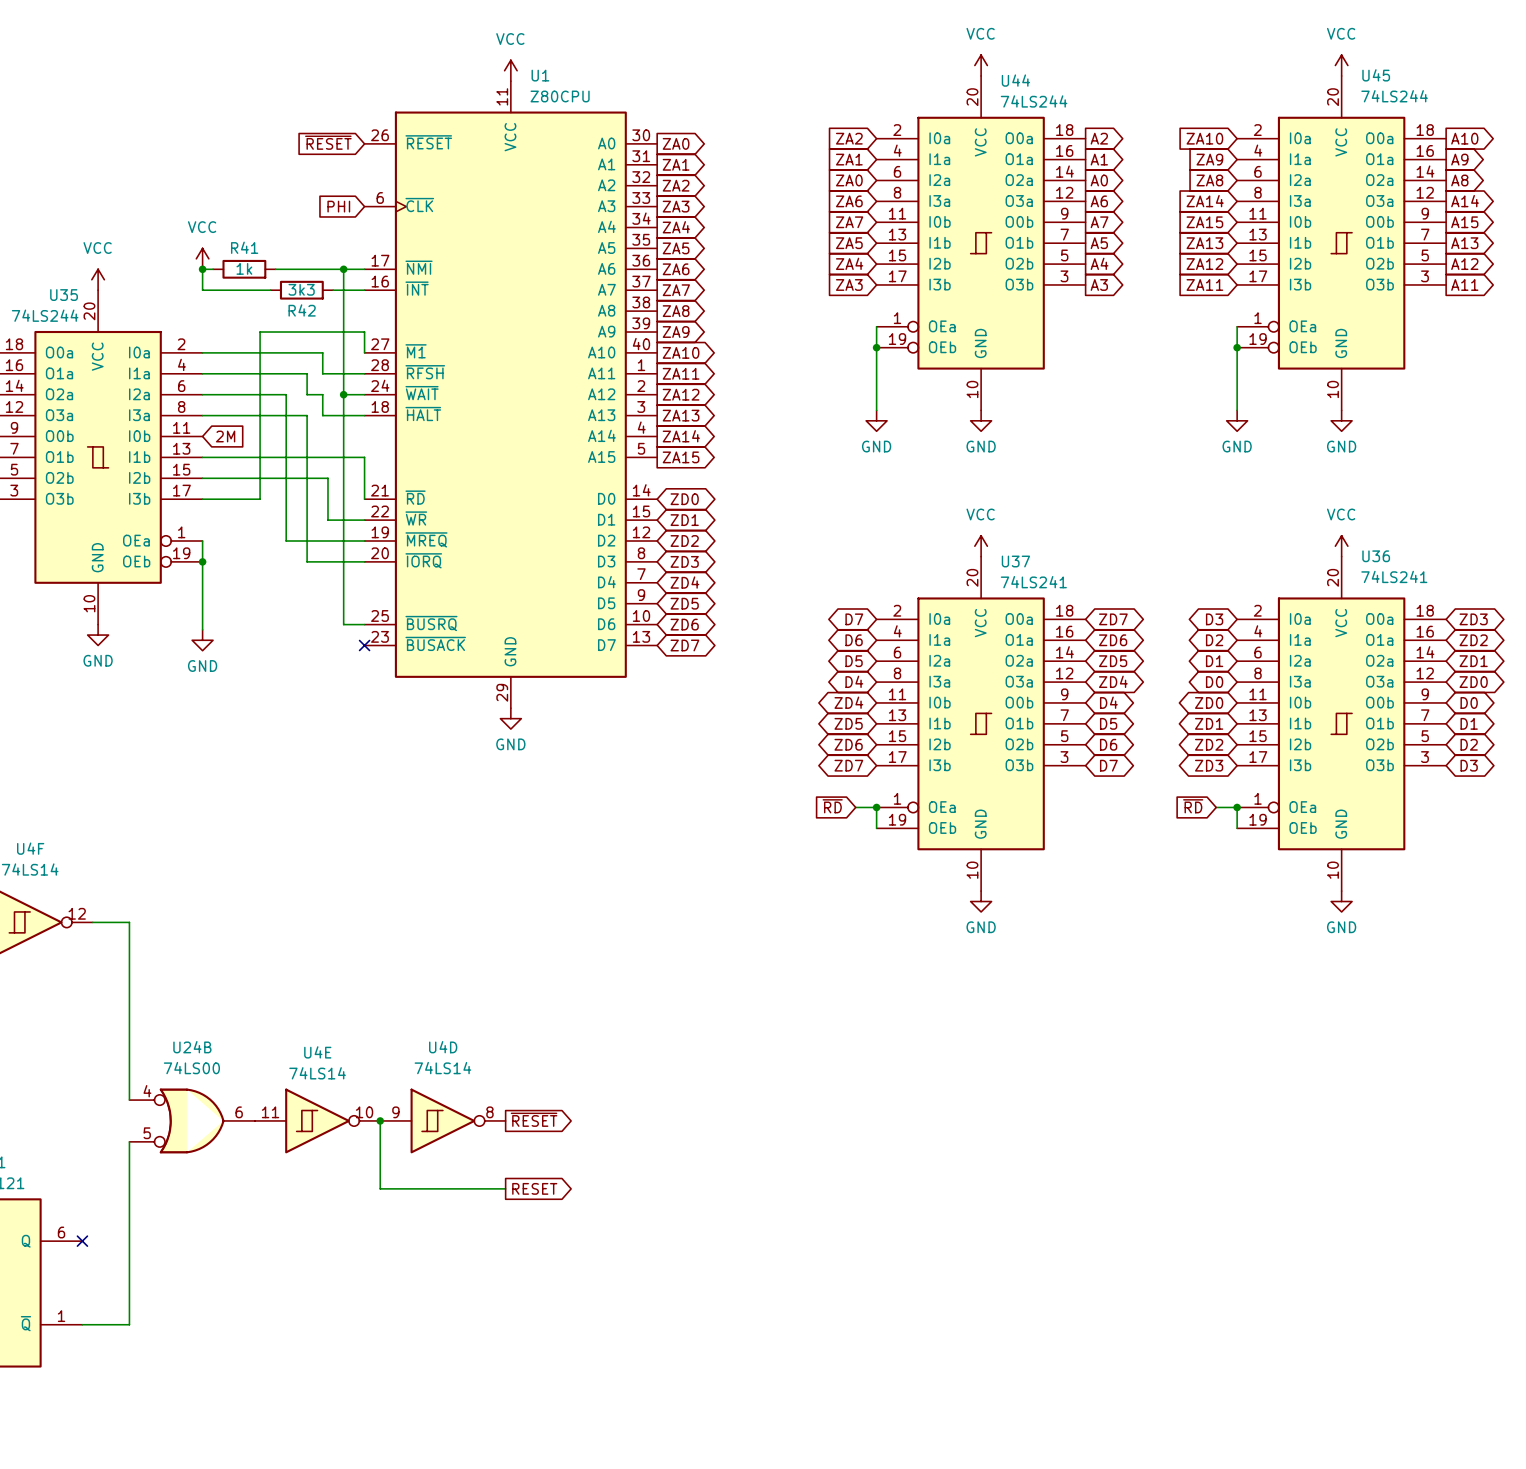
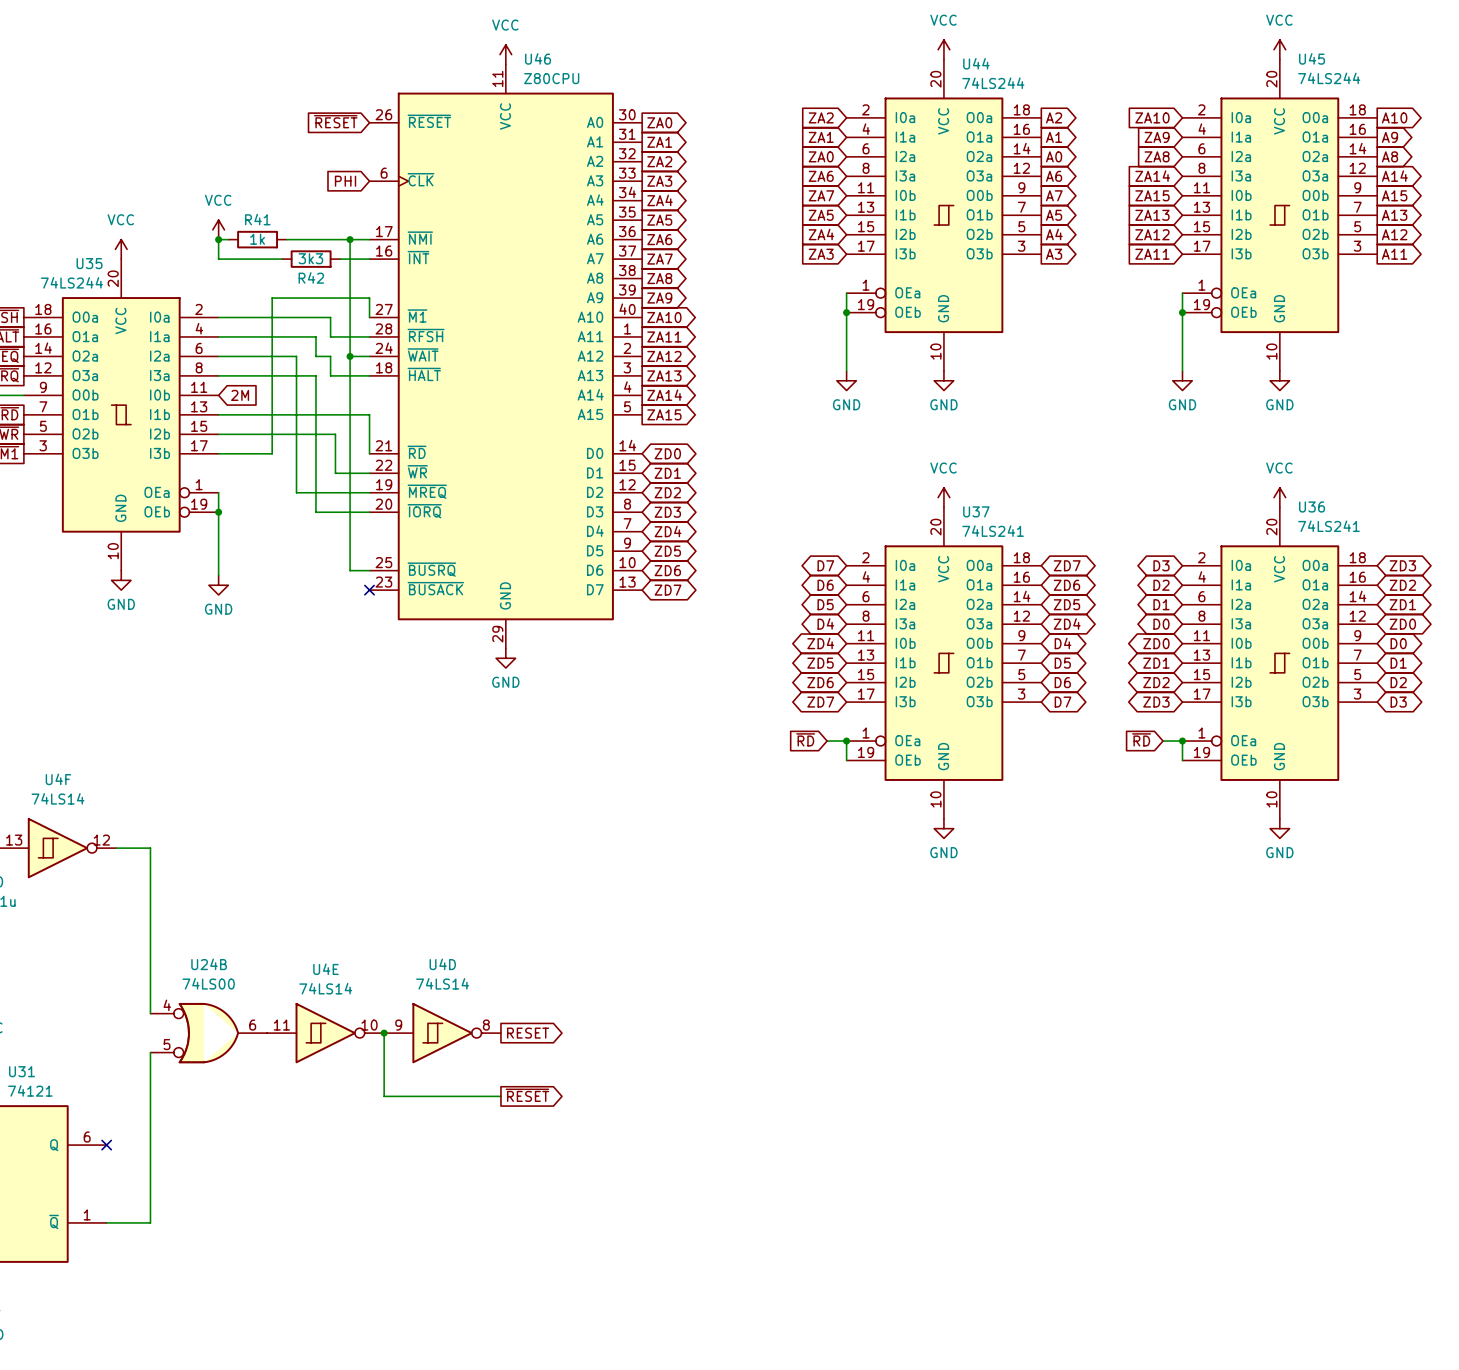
U1 name: U1 (540, 75) -> U46 (538, 58)
global label: ~{RESET} (534, 1119) -> RESET (528, 1033)
global label: RESET (534, 1188) -> ~{RESET} (527, 1095)

